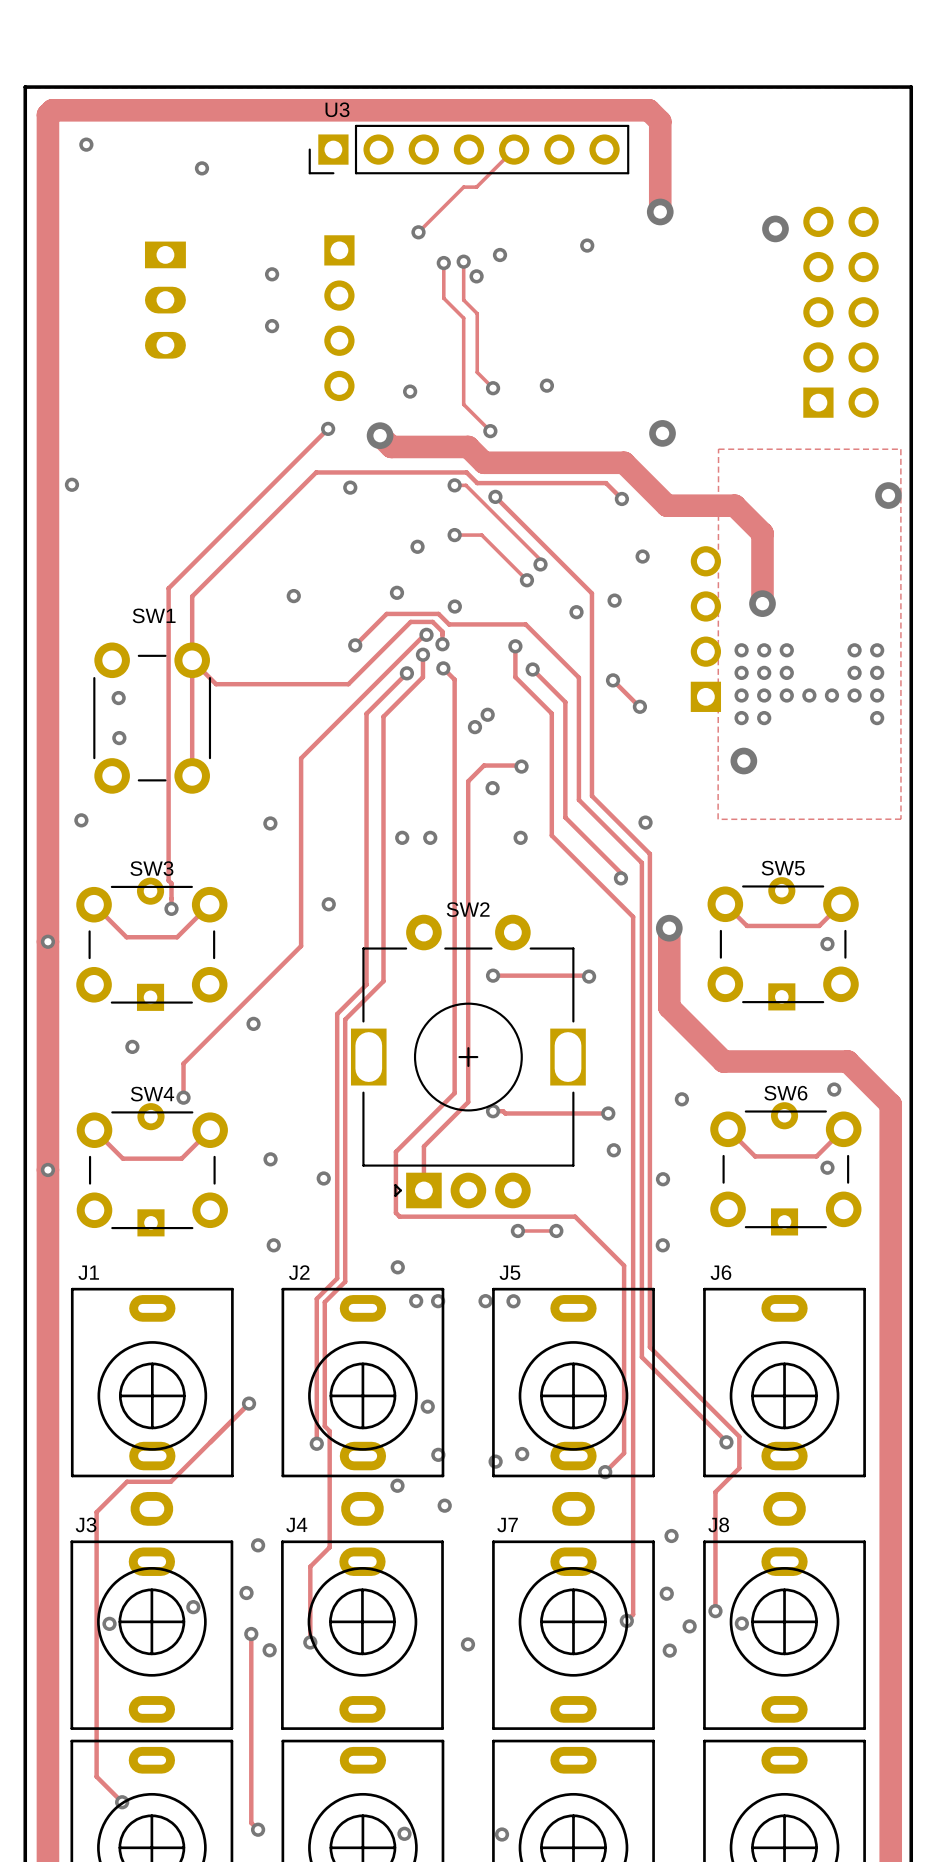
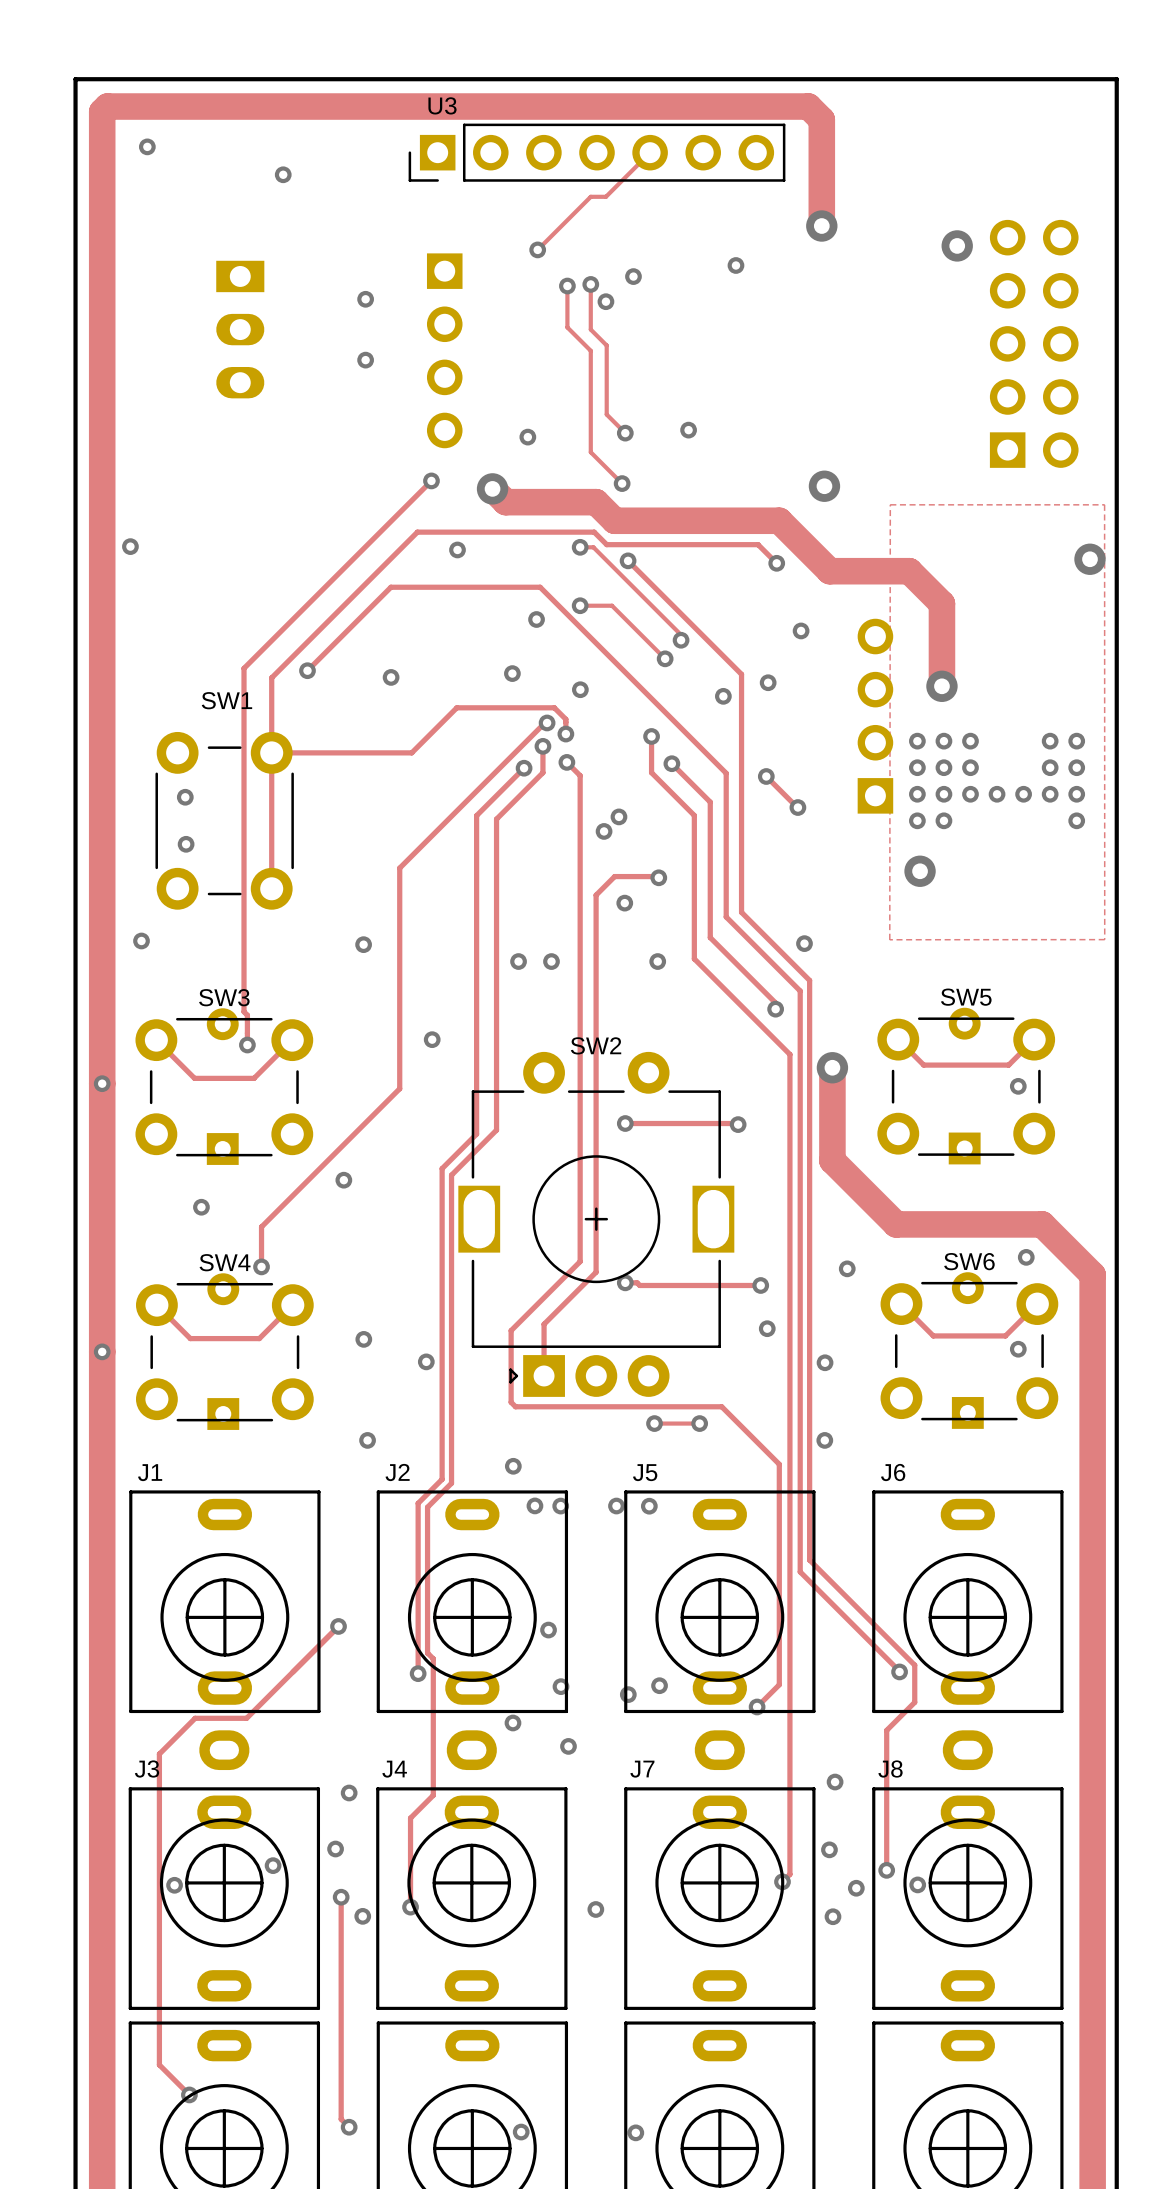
via: none -> (307, 670)
track: (410, 621) (348, 684) (216, 684) (192, 660) -> (528, 707) (456, 707) (411, 752) (271, 752)
track: (525, 624) (449, 624) (438, 613) (386, 613) (355, 645) -> (663, 710) (540, 587) (390, 587) (307, 670)
via: (355, 645) -> none

